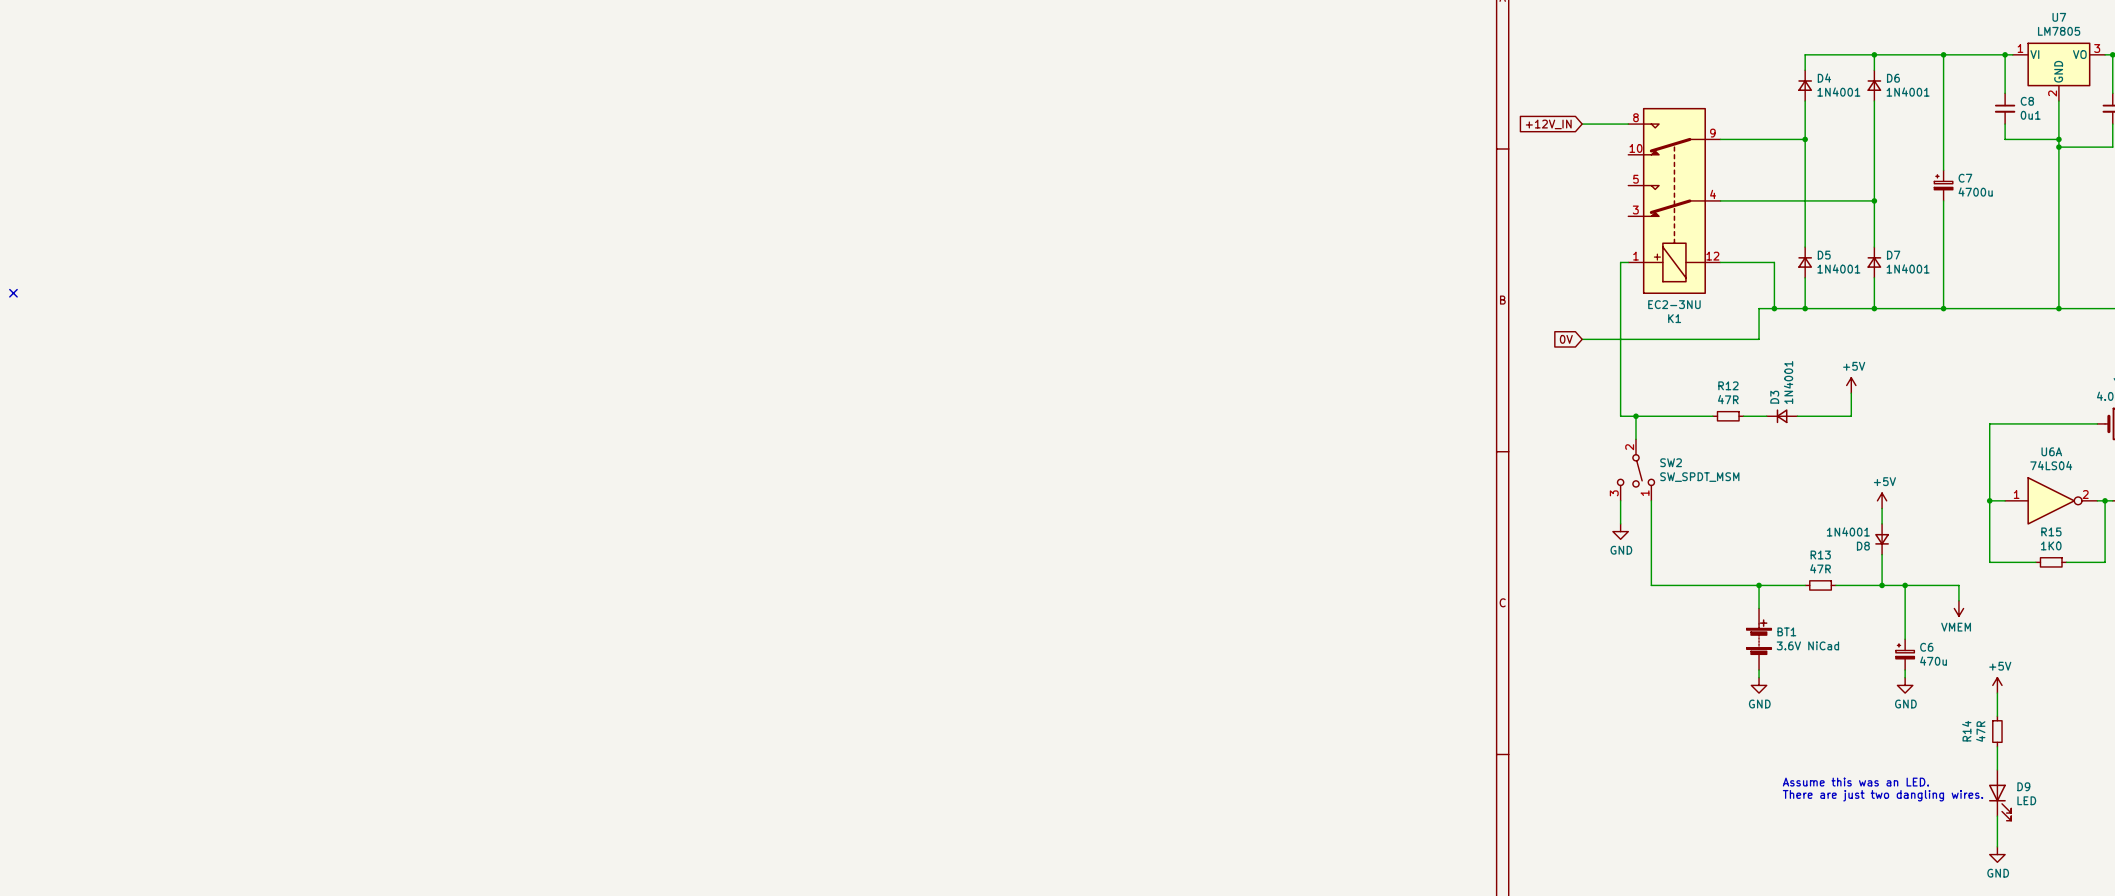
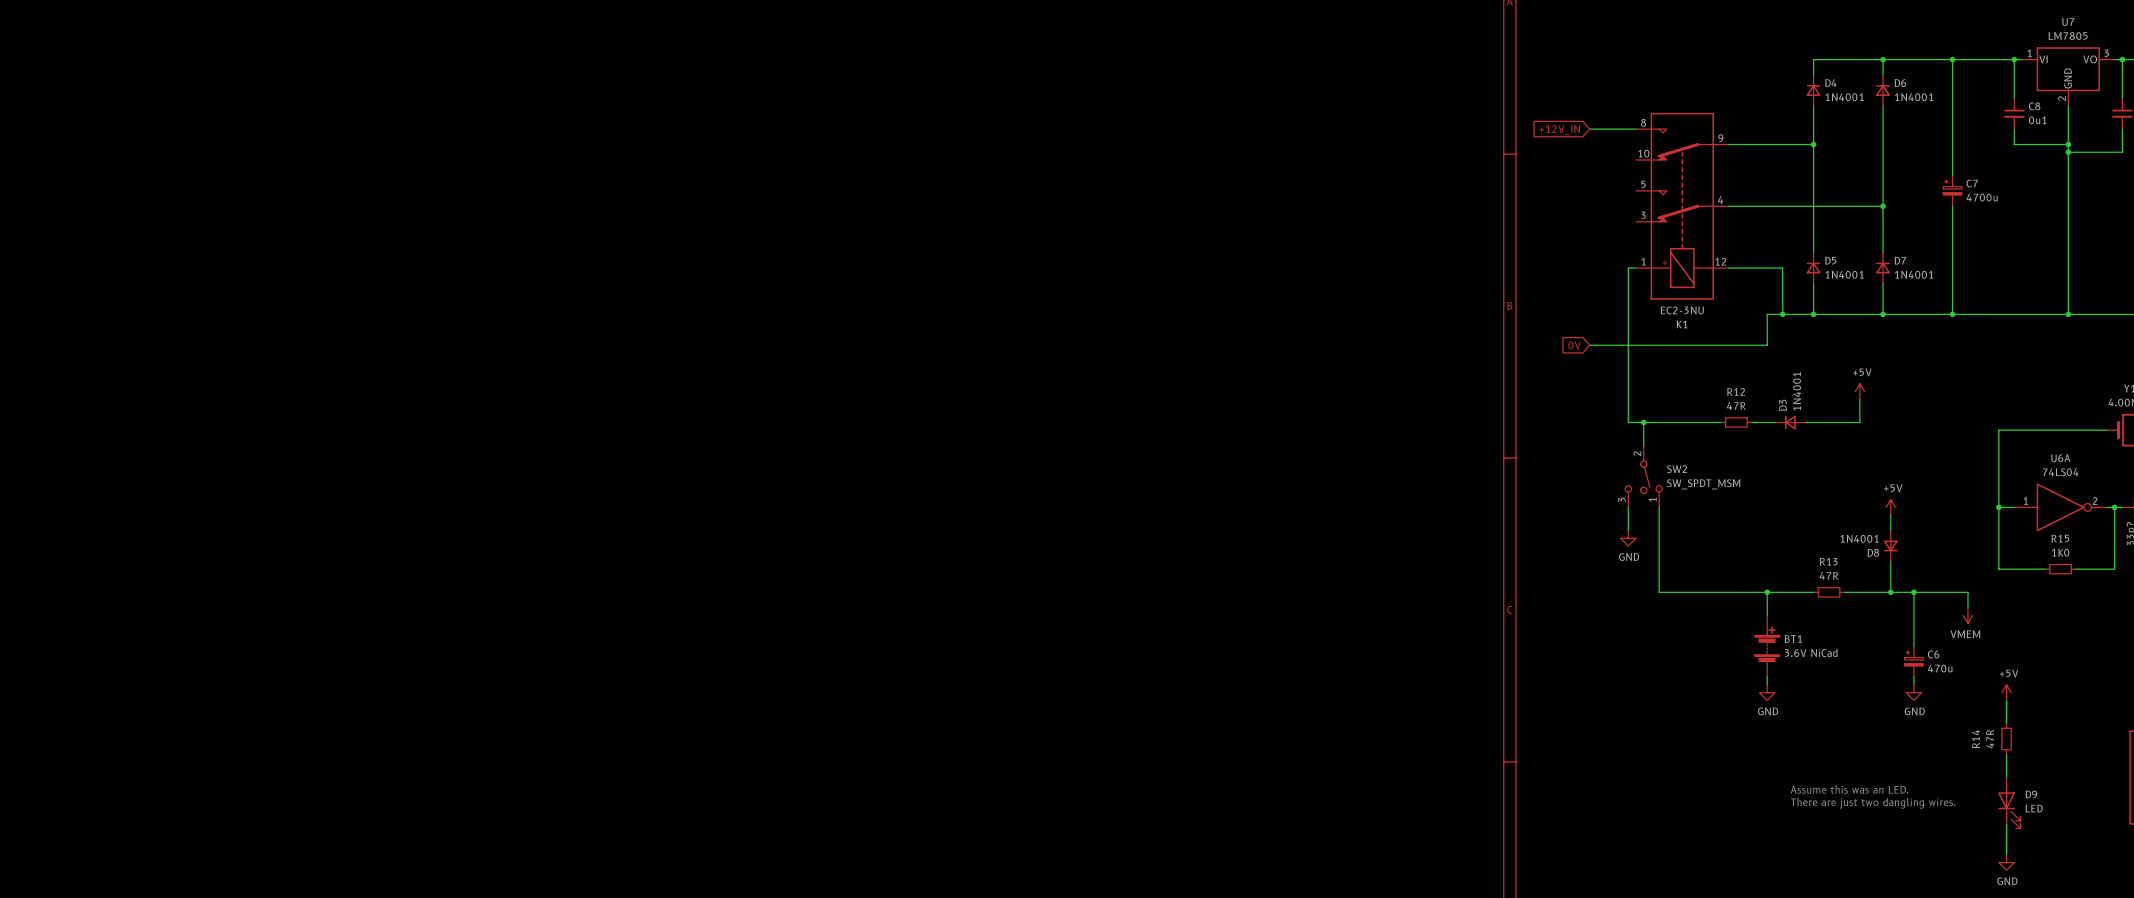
no-connect mark: (13, 293) -> none

